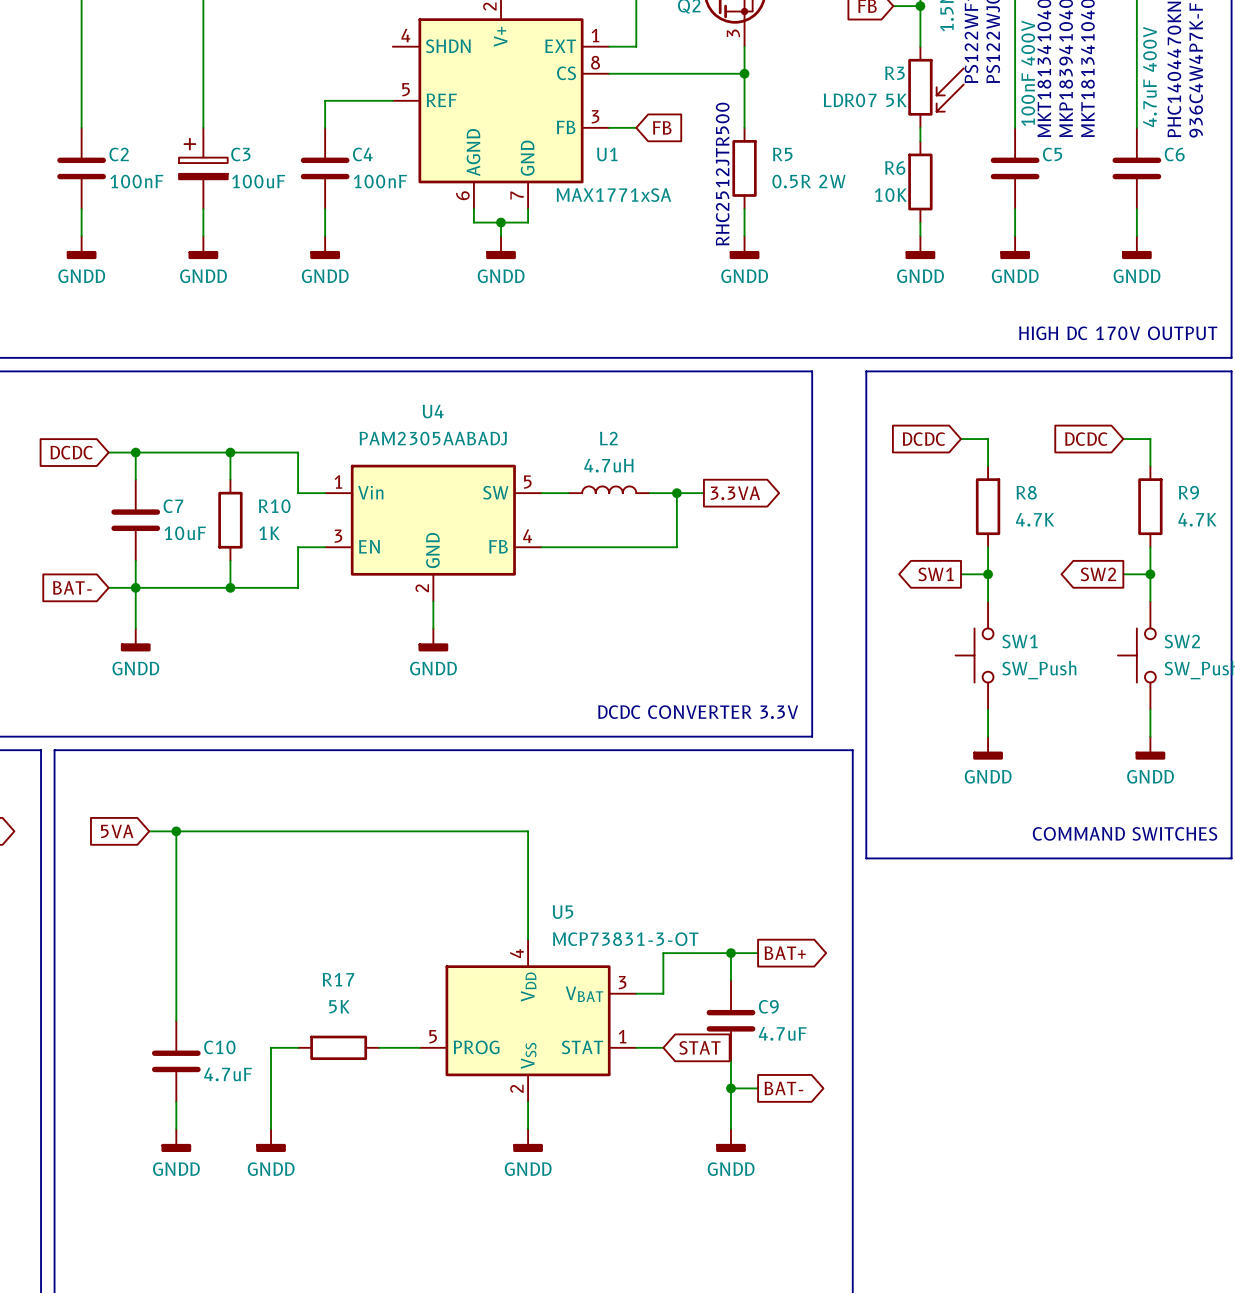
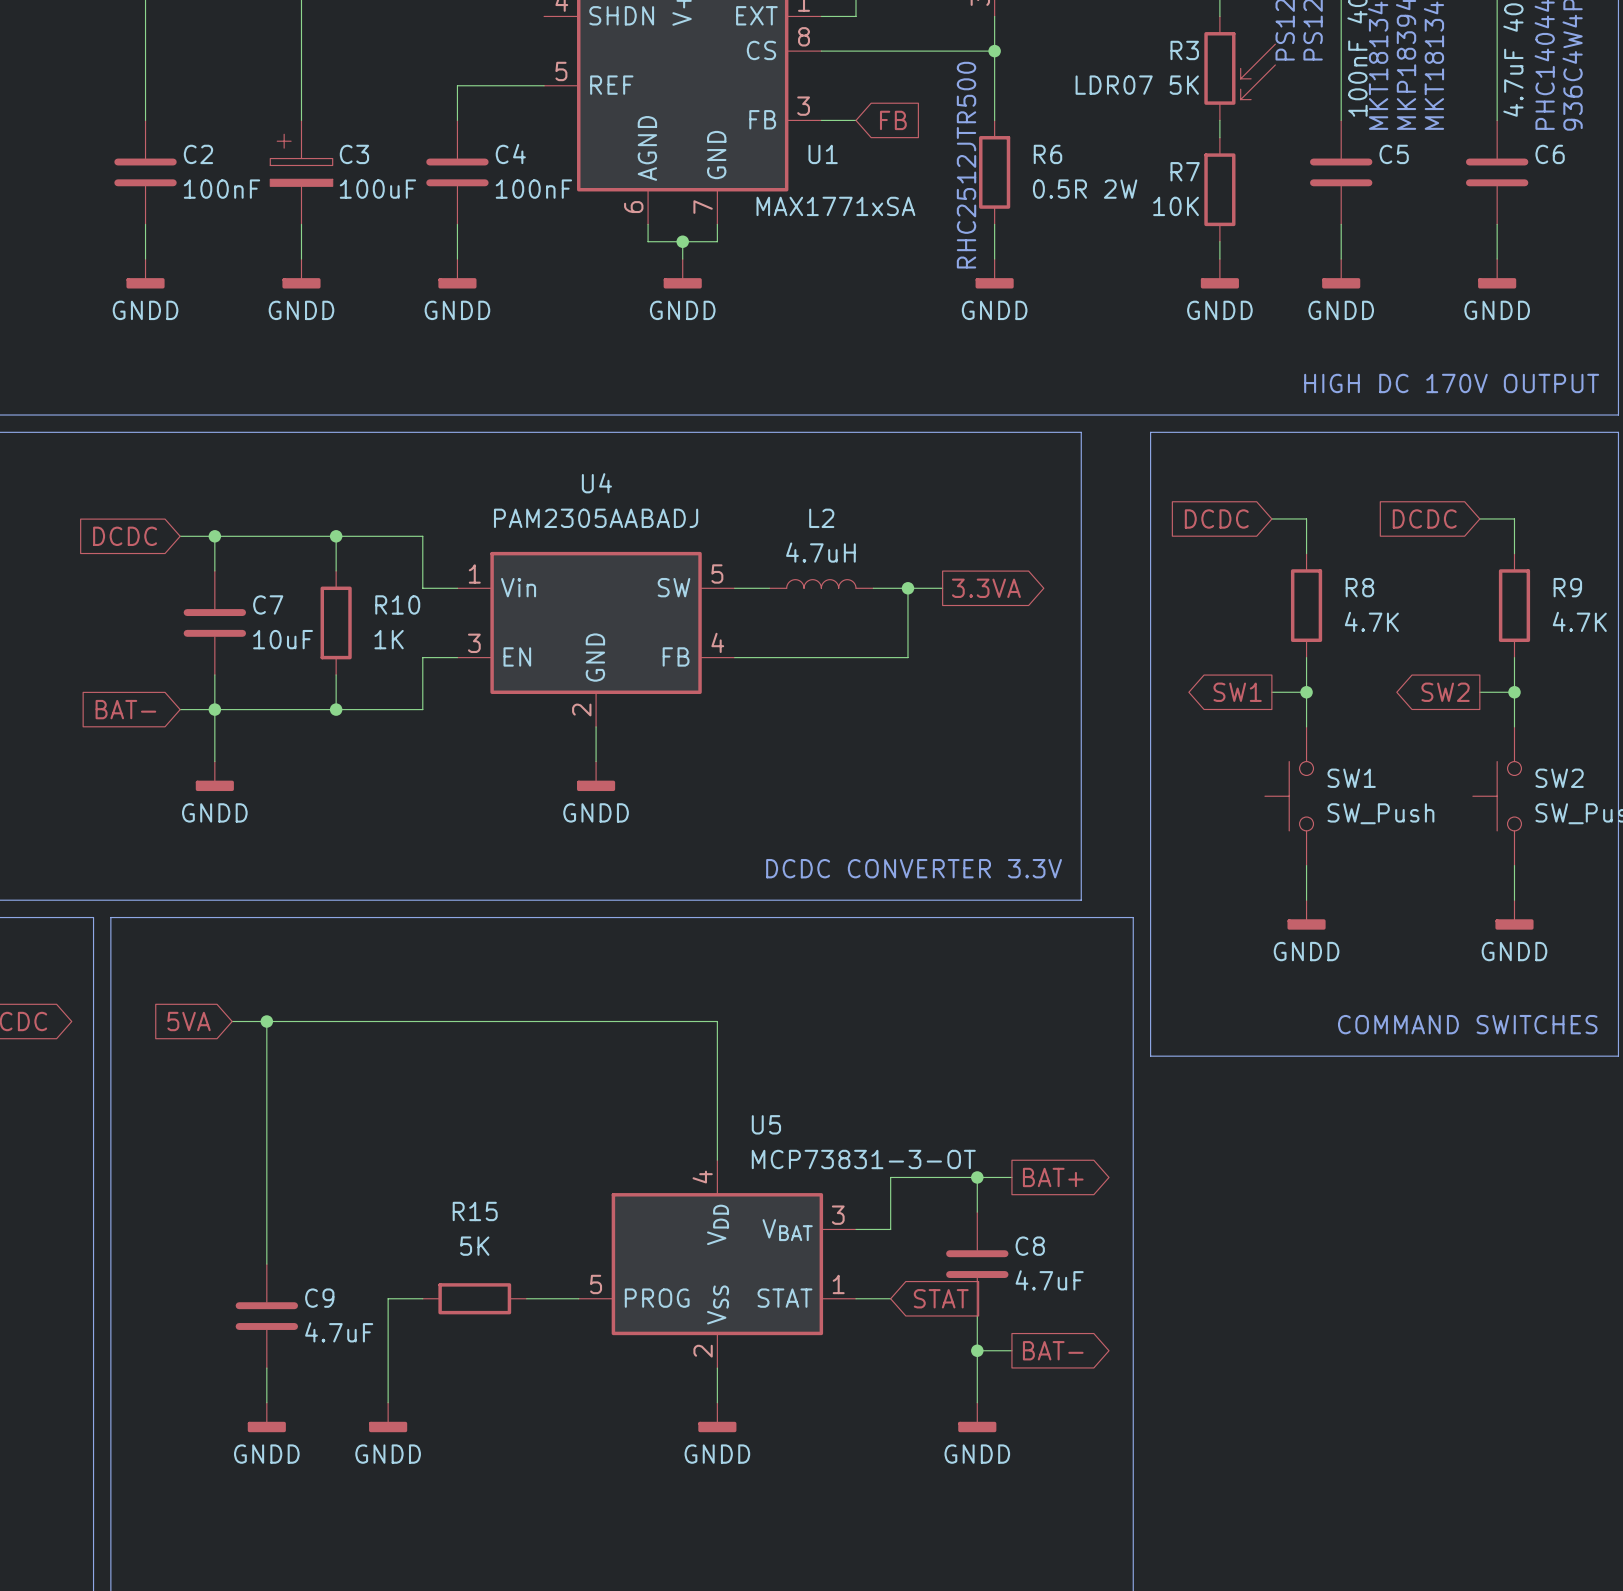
R5 name: R5 (782, 154) -> R6 (1047, 154)
R6 name: R6 (895, 168) -> R7 (1185, 171)
R17 name: R17 (338, 979) -> R15 (475, 1211)
C9 name: C9 (768, 1006) -> C8 (1030, 1246)
C10 name: C10 (219, 1047) -> C9 (319, 1298)

